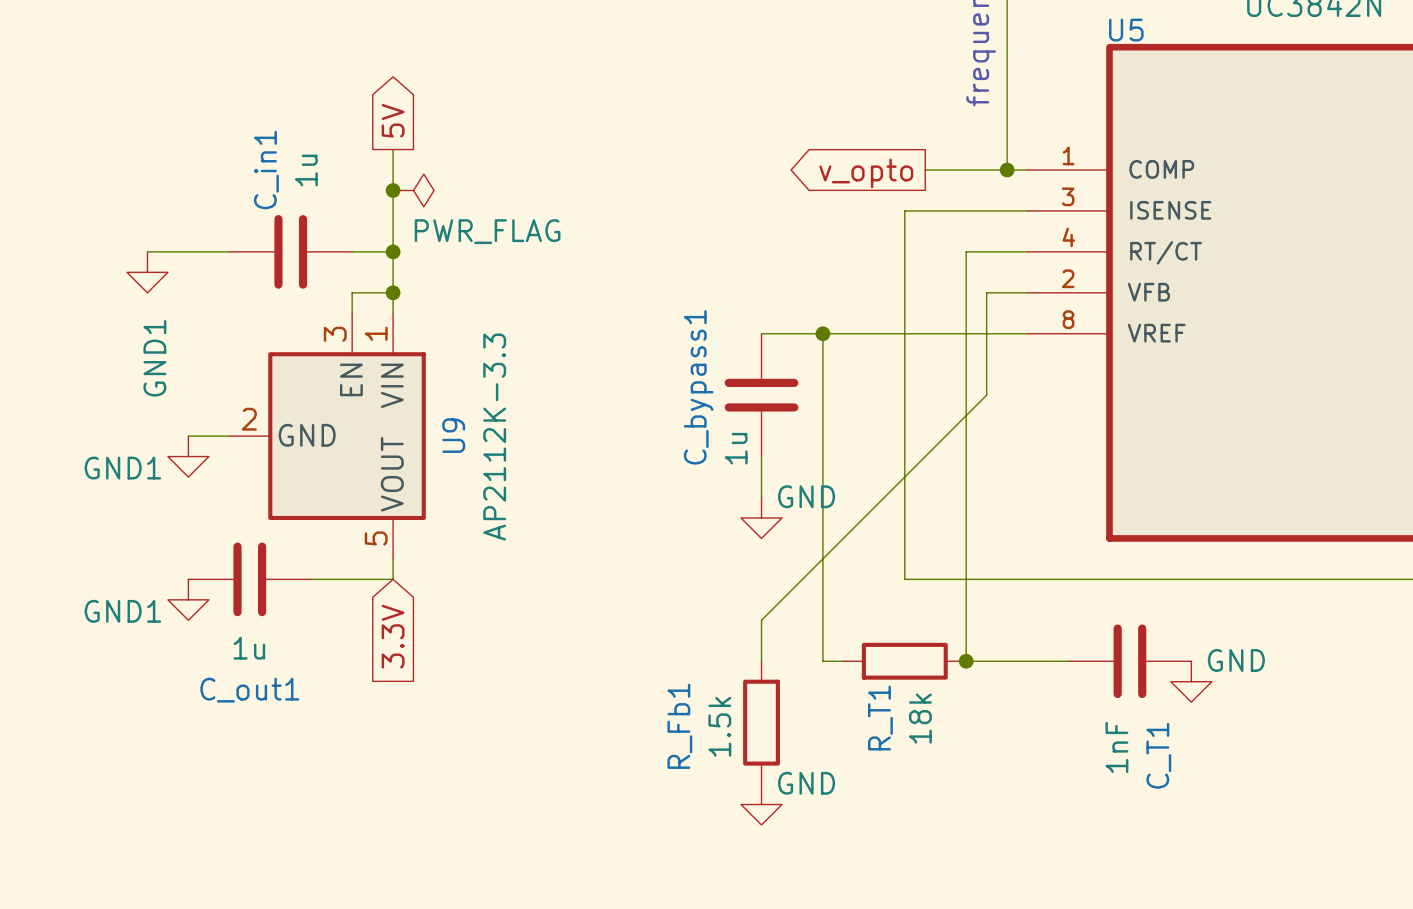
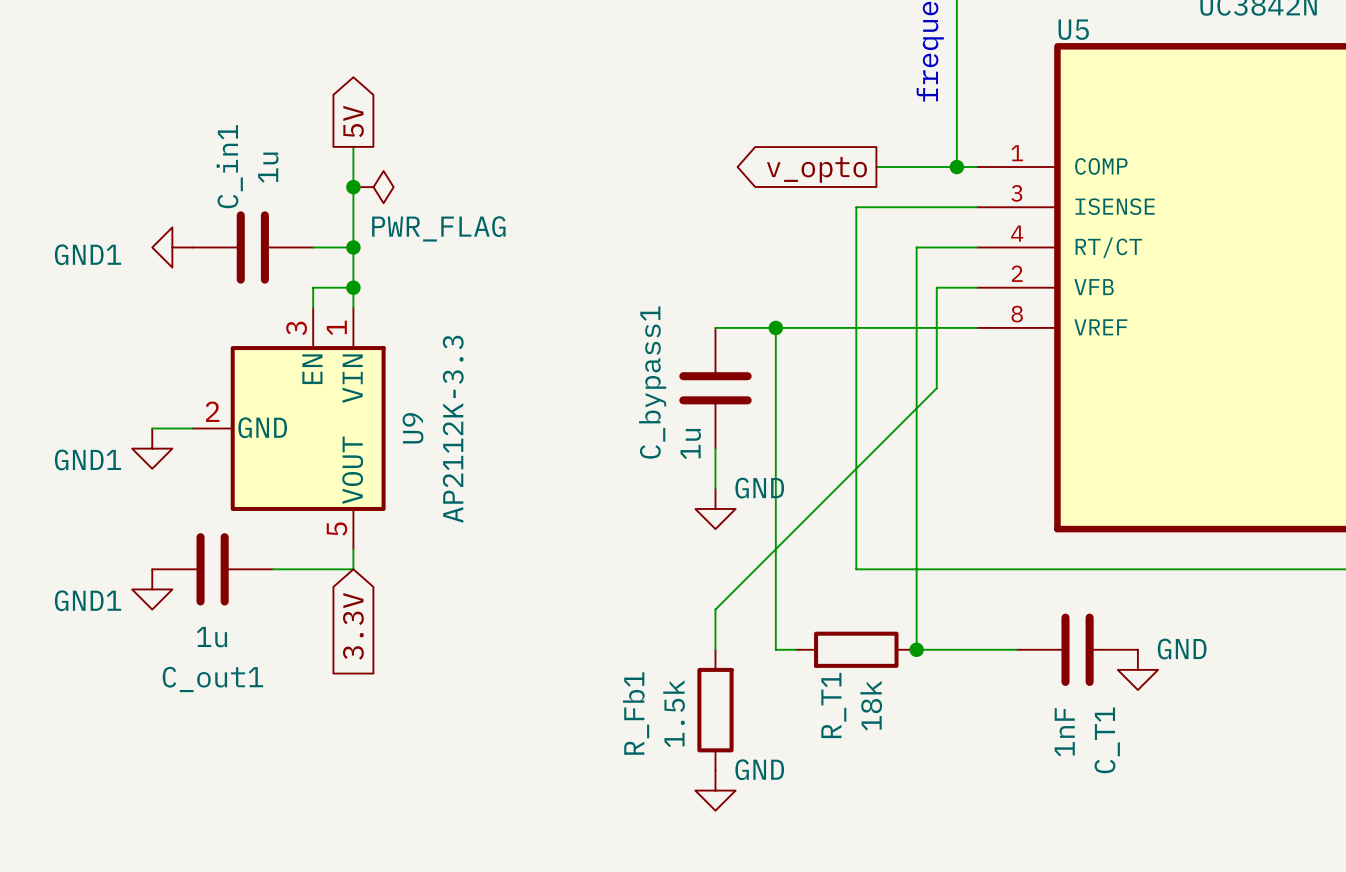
wire: (147, 251) (229, 251) -> none
power symbol rotation: 0° (147, 272) -> 90° clockwise (172, 247)
power symbol position: GND1 (147, 272) -> GND1 (172, 247)

